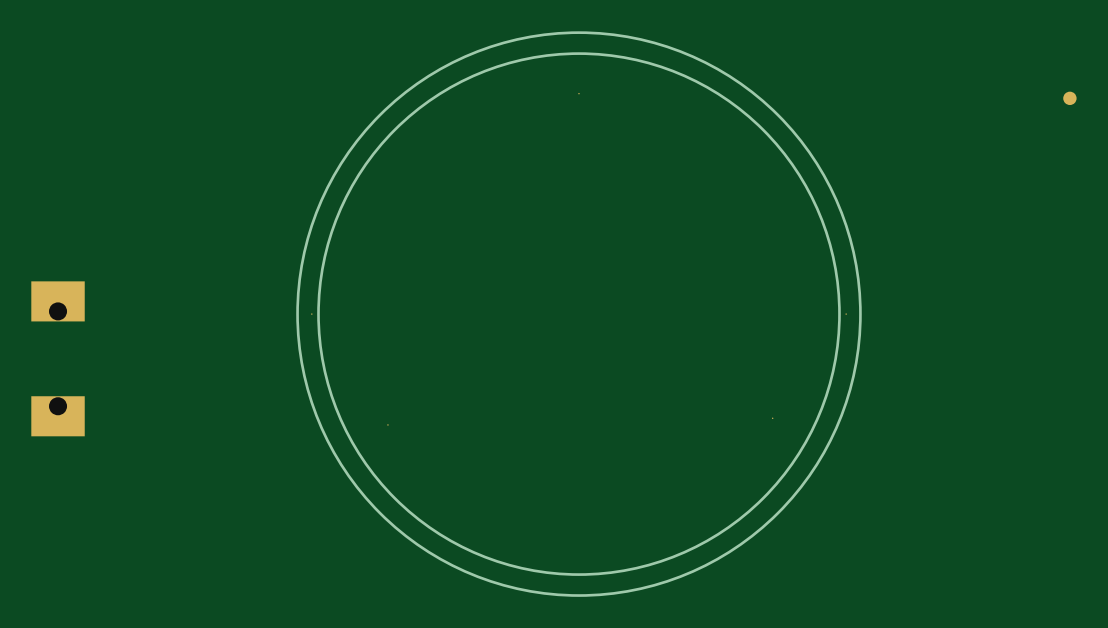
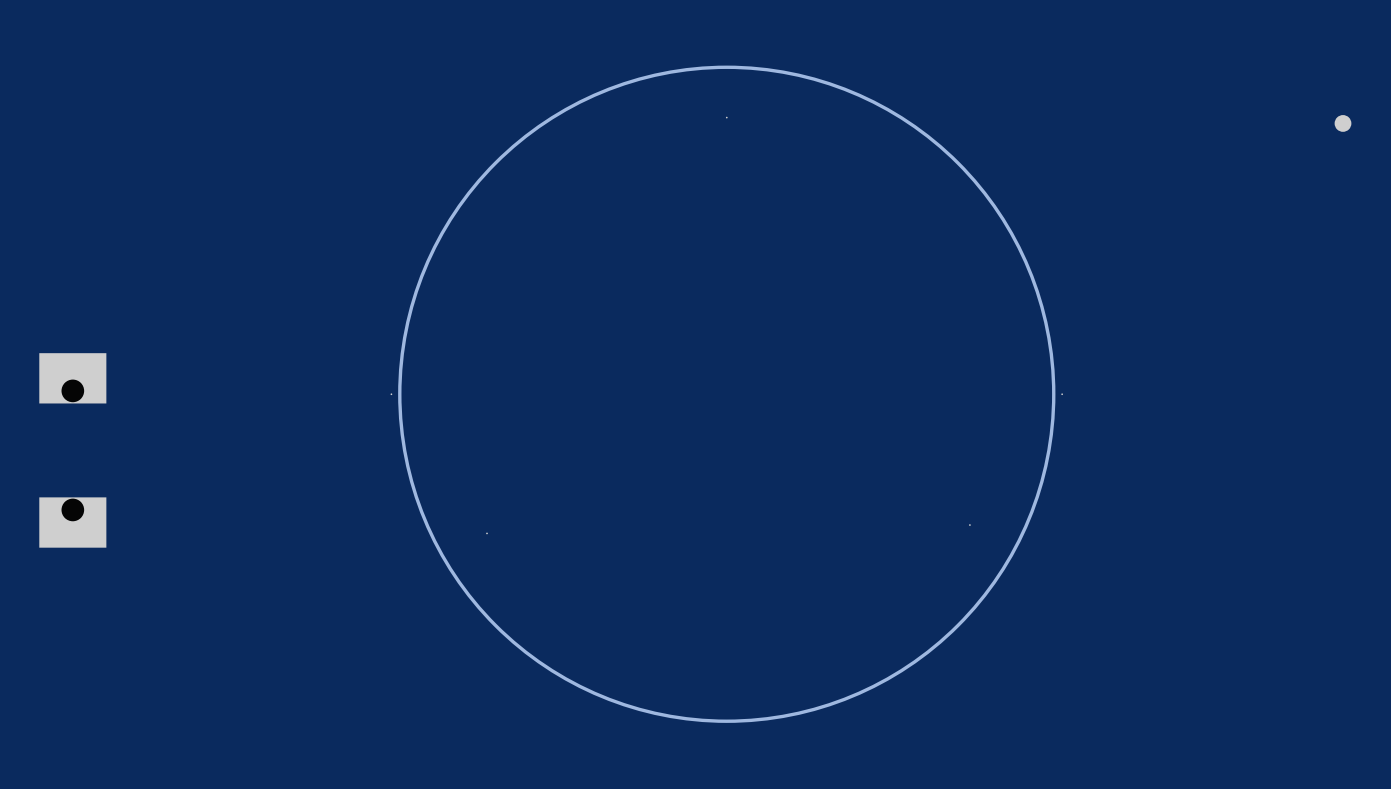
drawing: [296, 31, 862, 597] -> none

